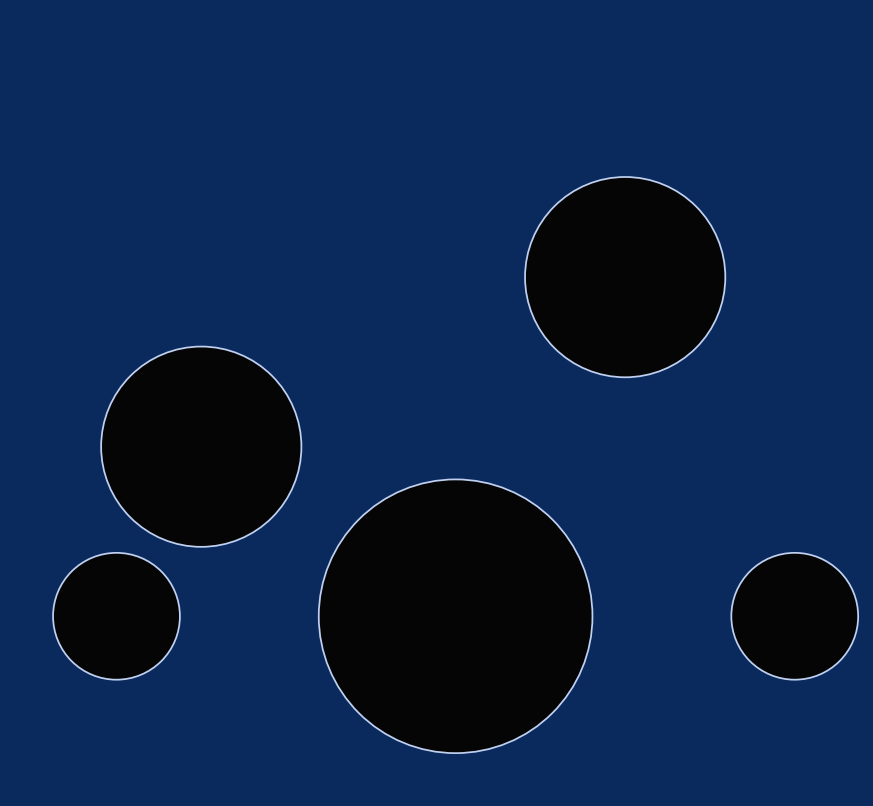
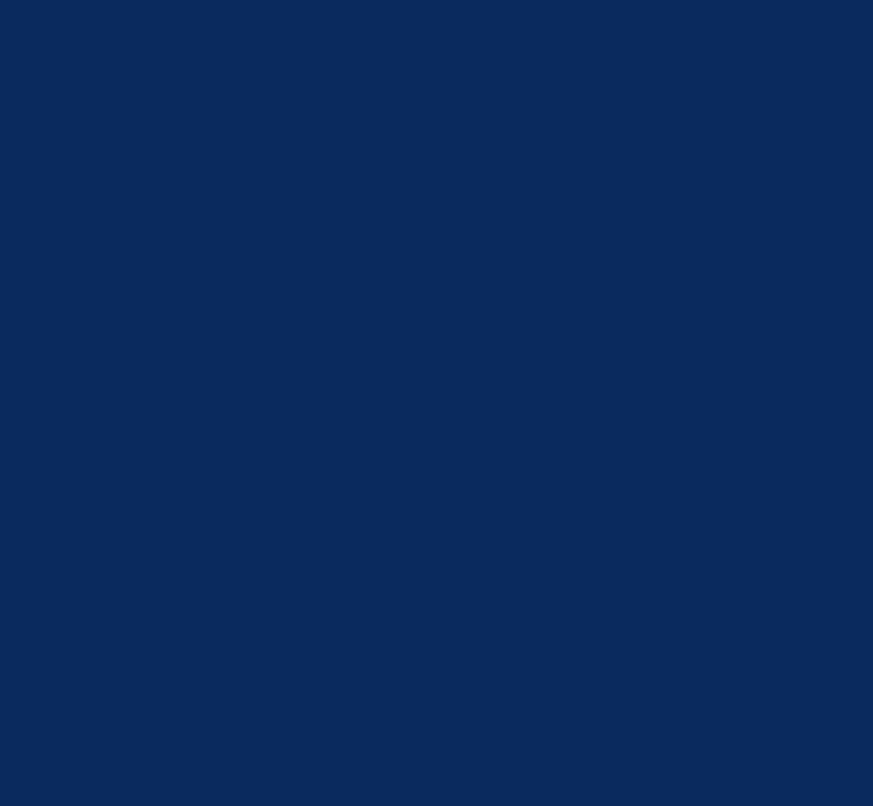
part: (455, 465) -> none

